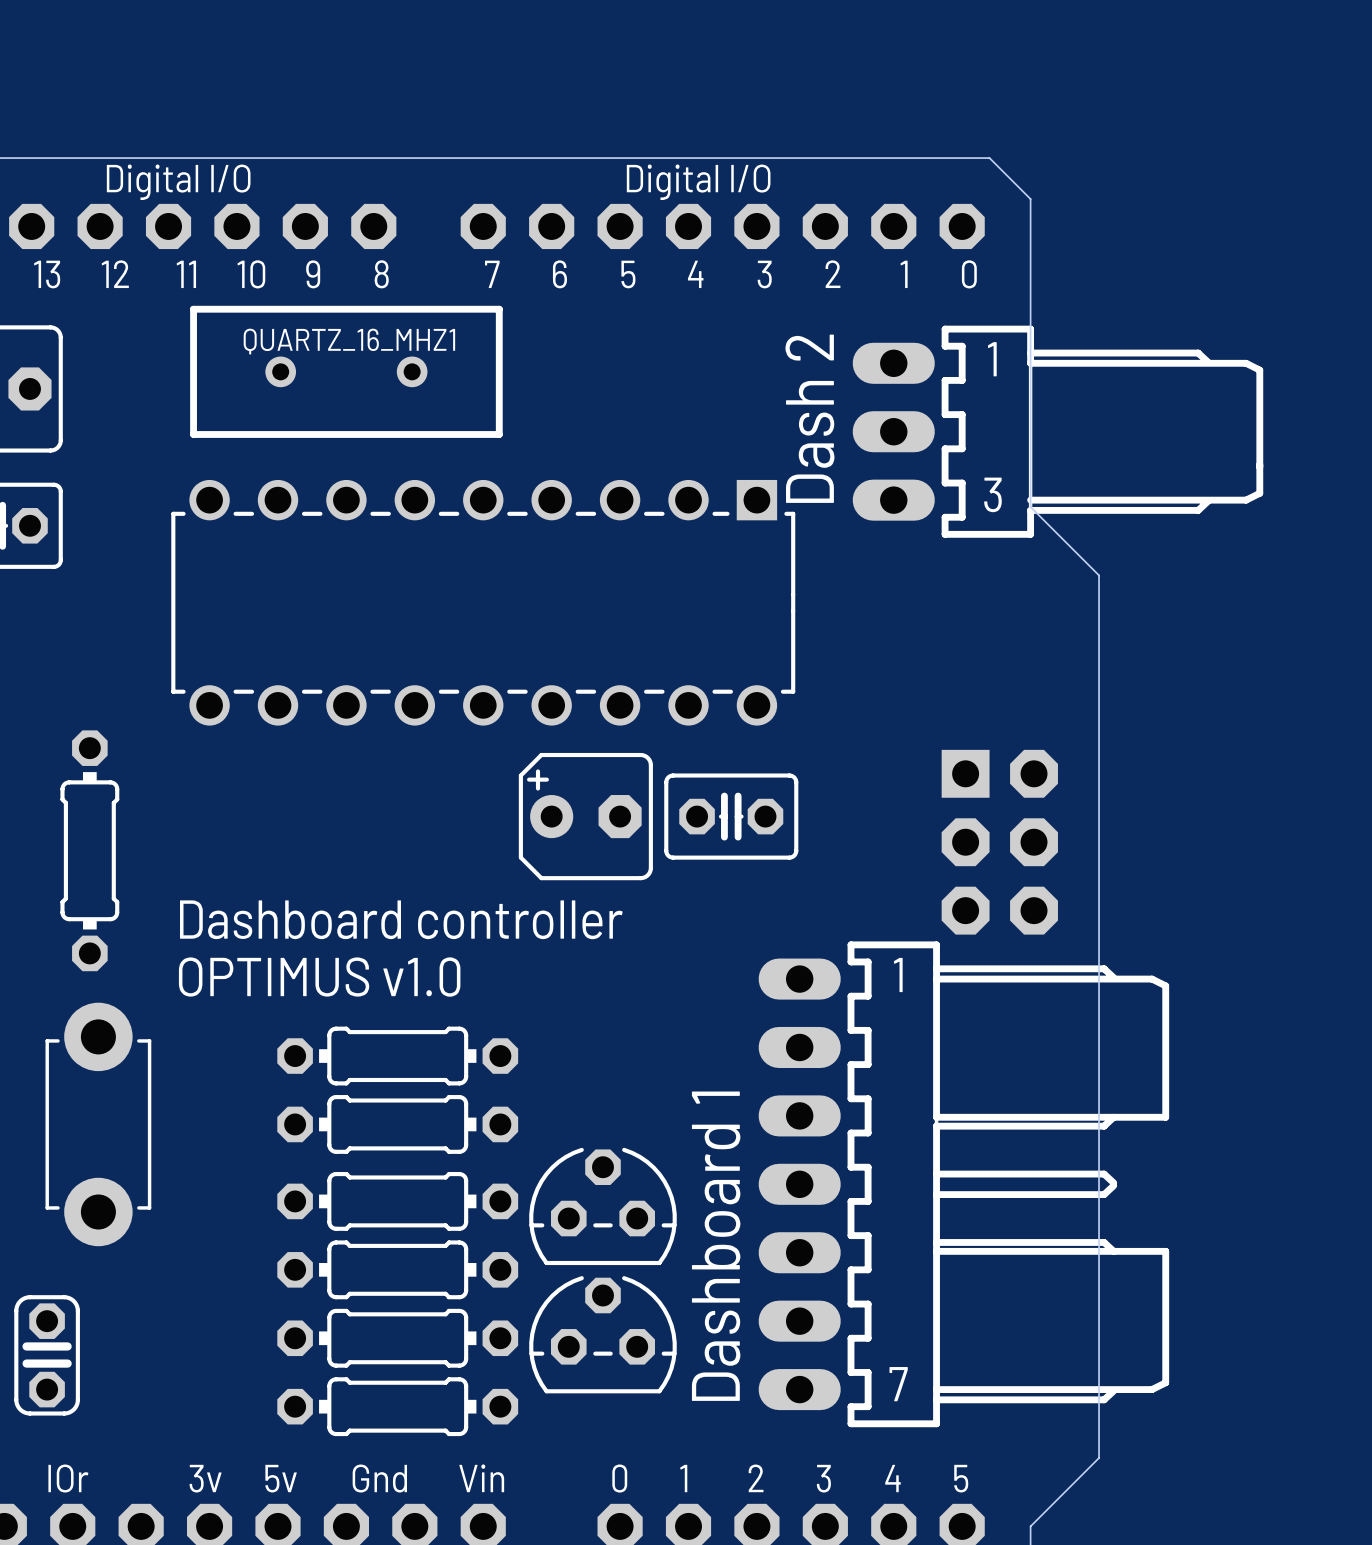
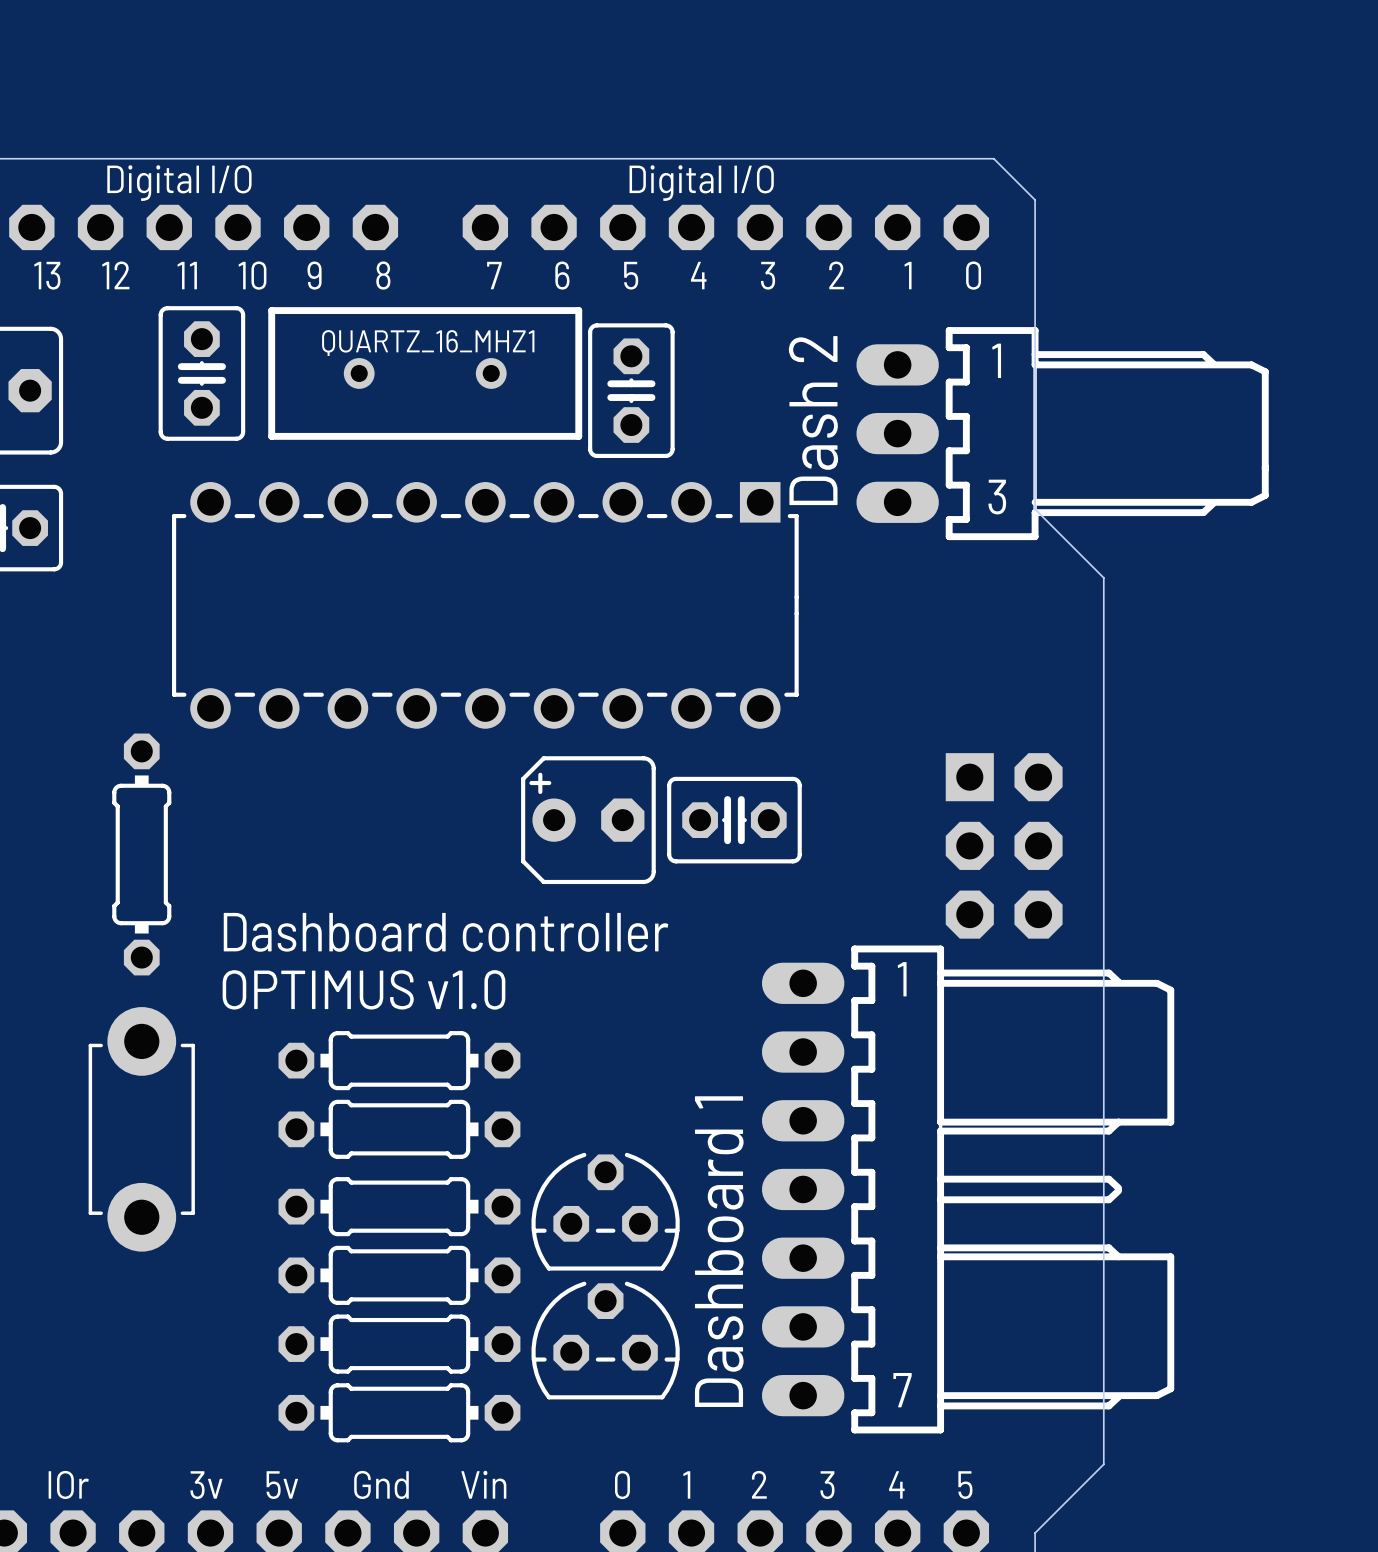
part: none -> (201, 373)
QUARTZ_16_MHZ1 position: (346, 371) -> (425, 373)
part: none -> (631, 390)
part position: (89, 850) -> (141, 854)
text position: Dashboard controller (401, 919) -> Dashboard controller (446, 932)
text position: OPTIMUS v1.0 (319, 977) -> OPTIMUS v1.0 (364, 989)
part position: (98, 1124) -> (141, 1129)
part: (47, 1355) -> none

